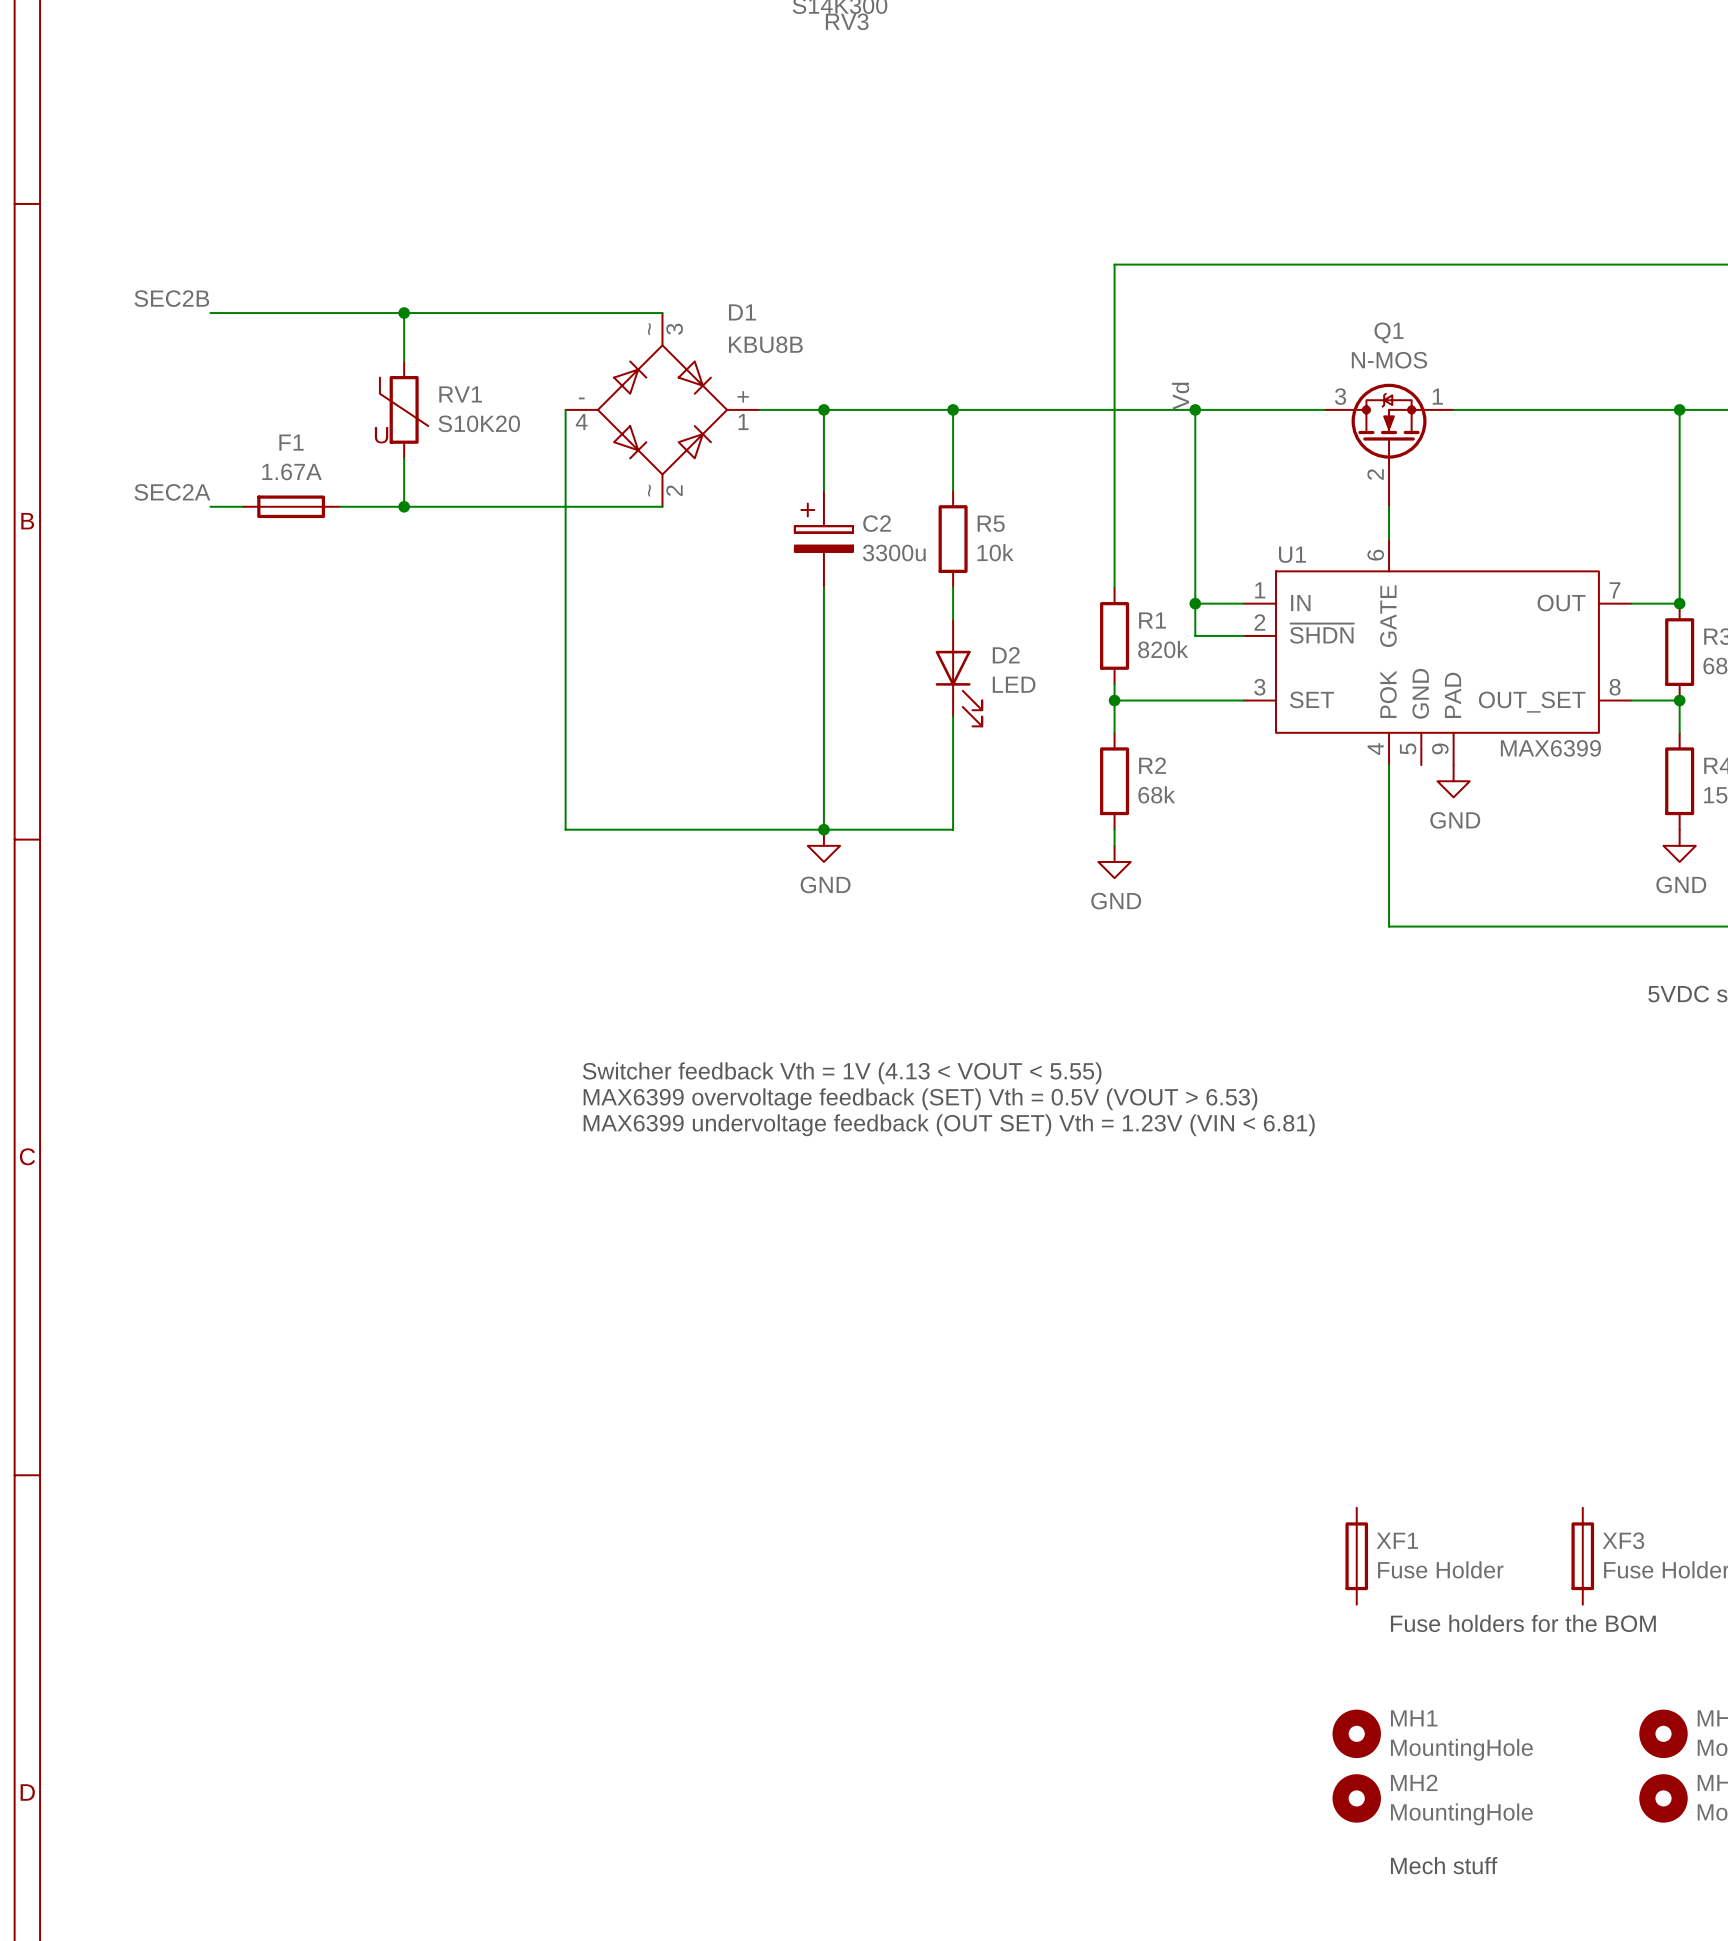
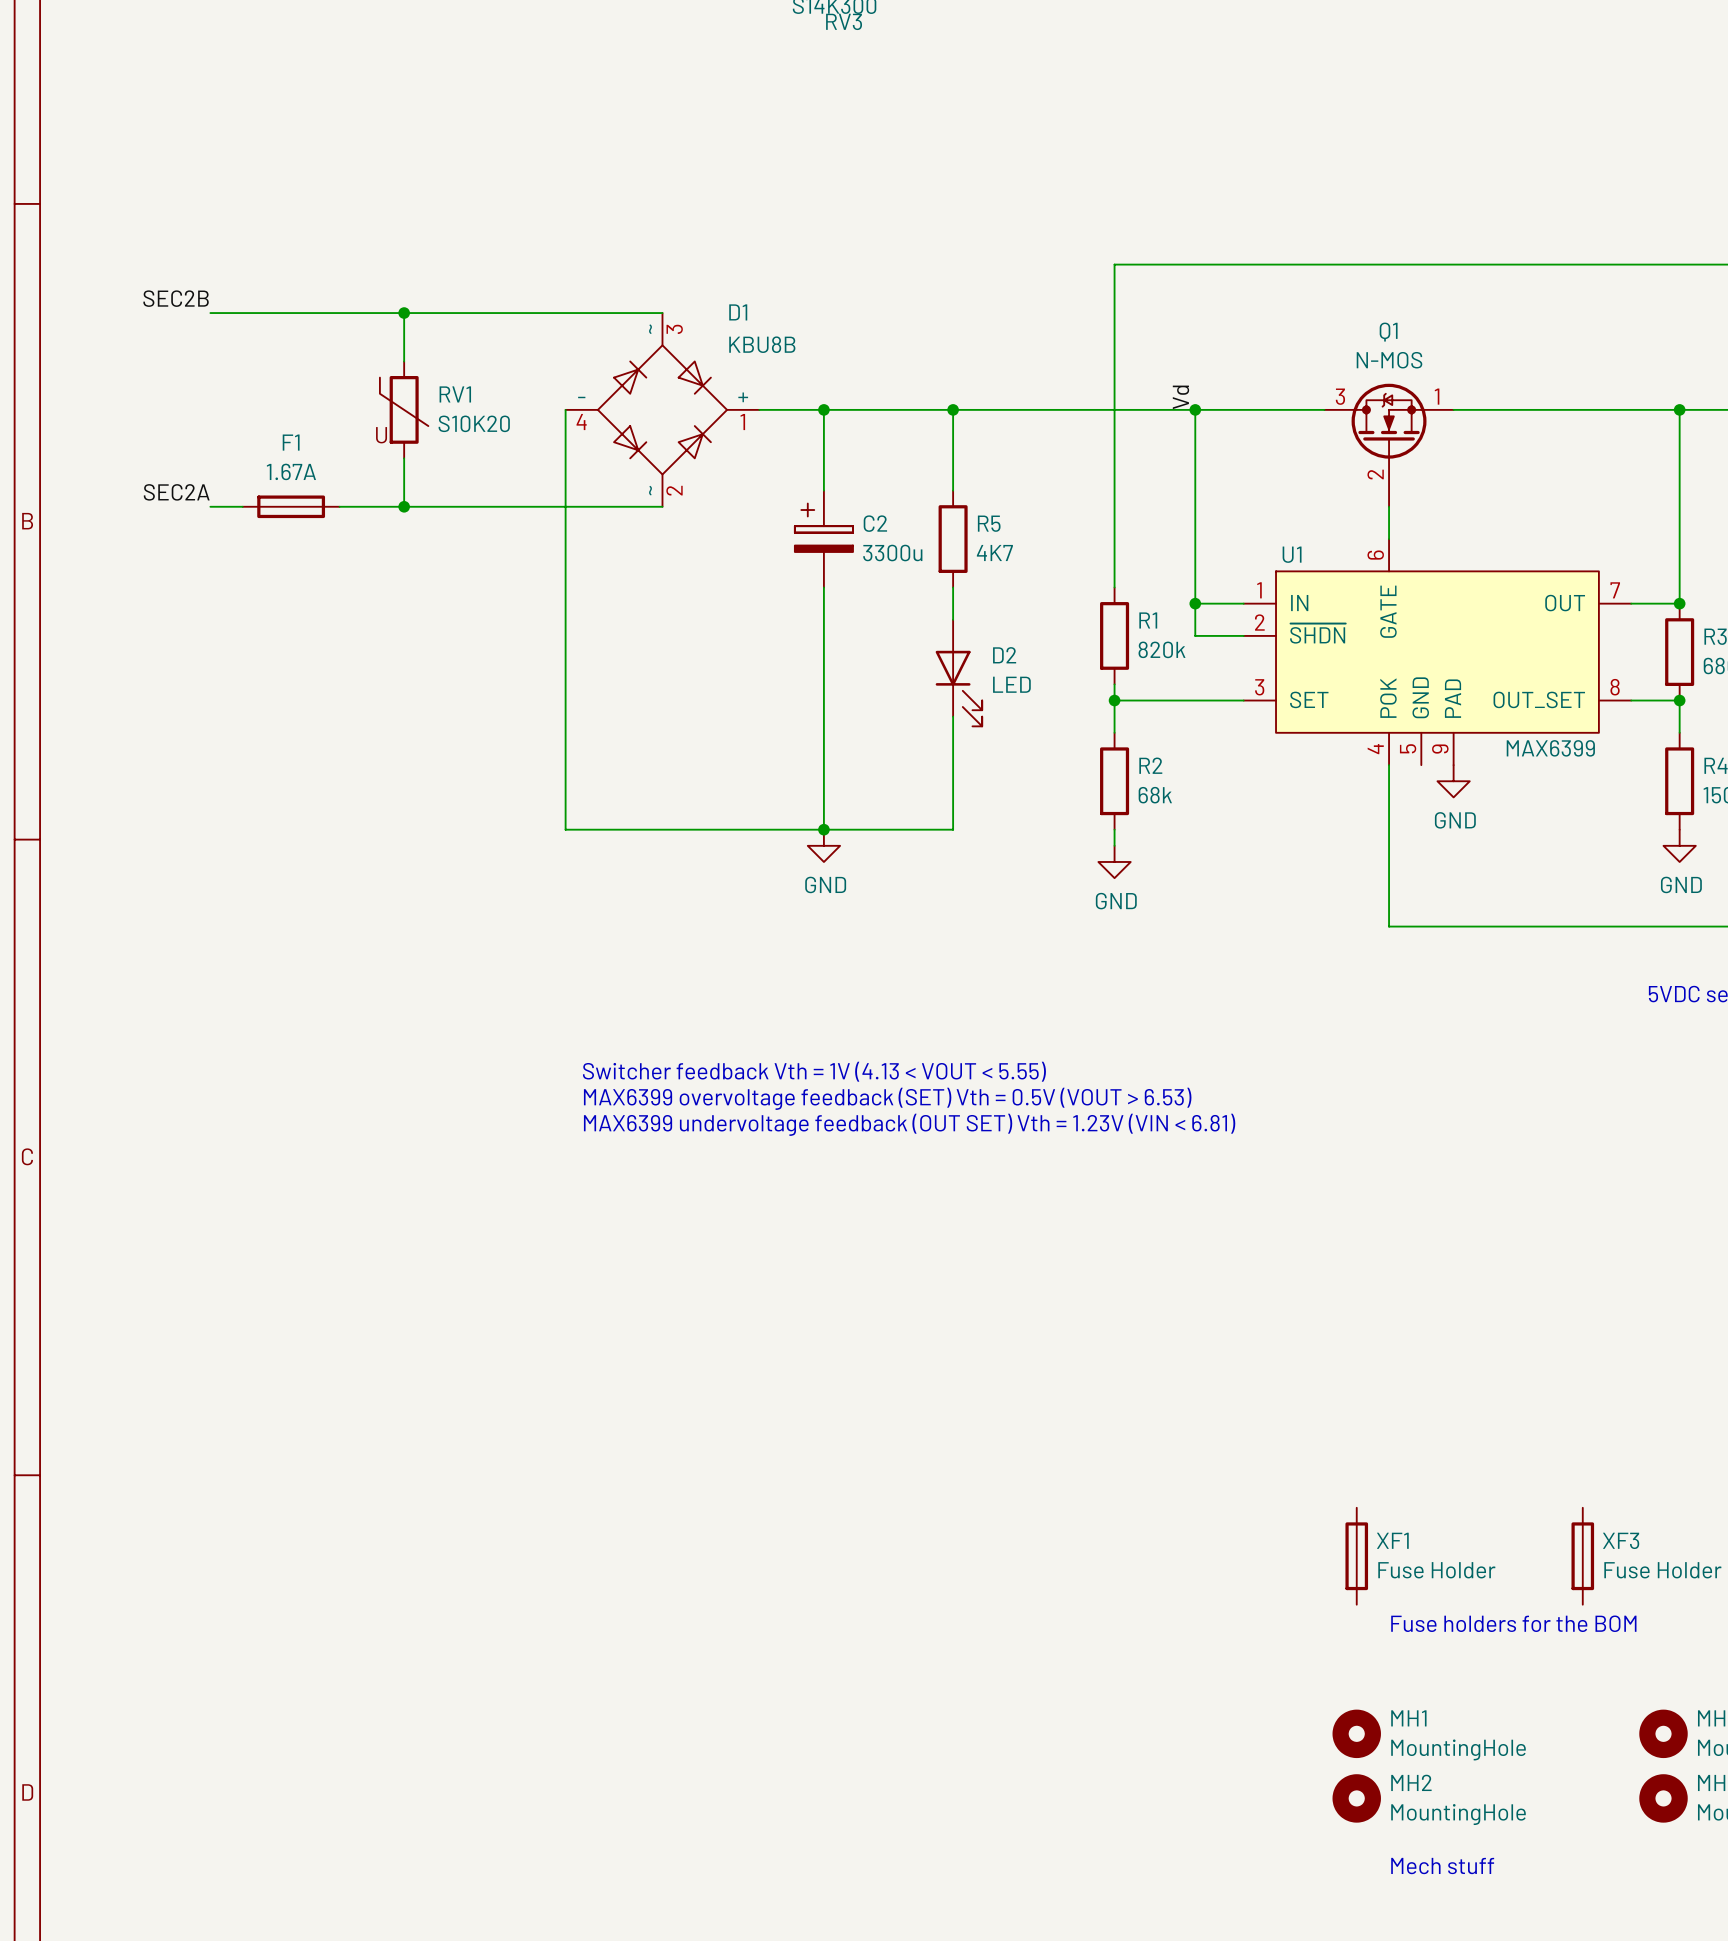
R5 value: 10k (995, 552) -> 4K7 (994, 553)

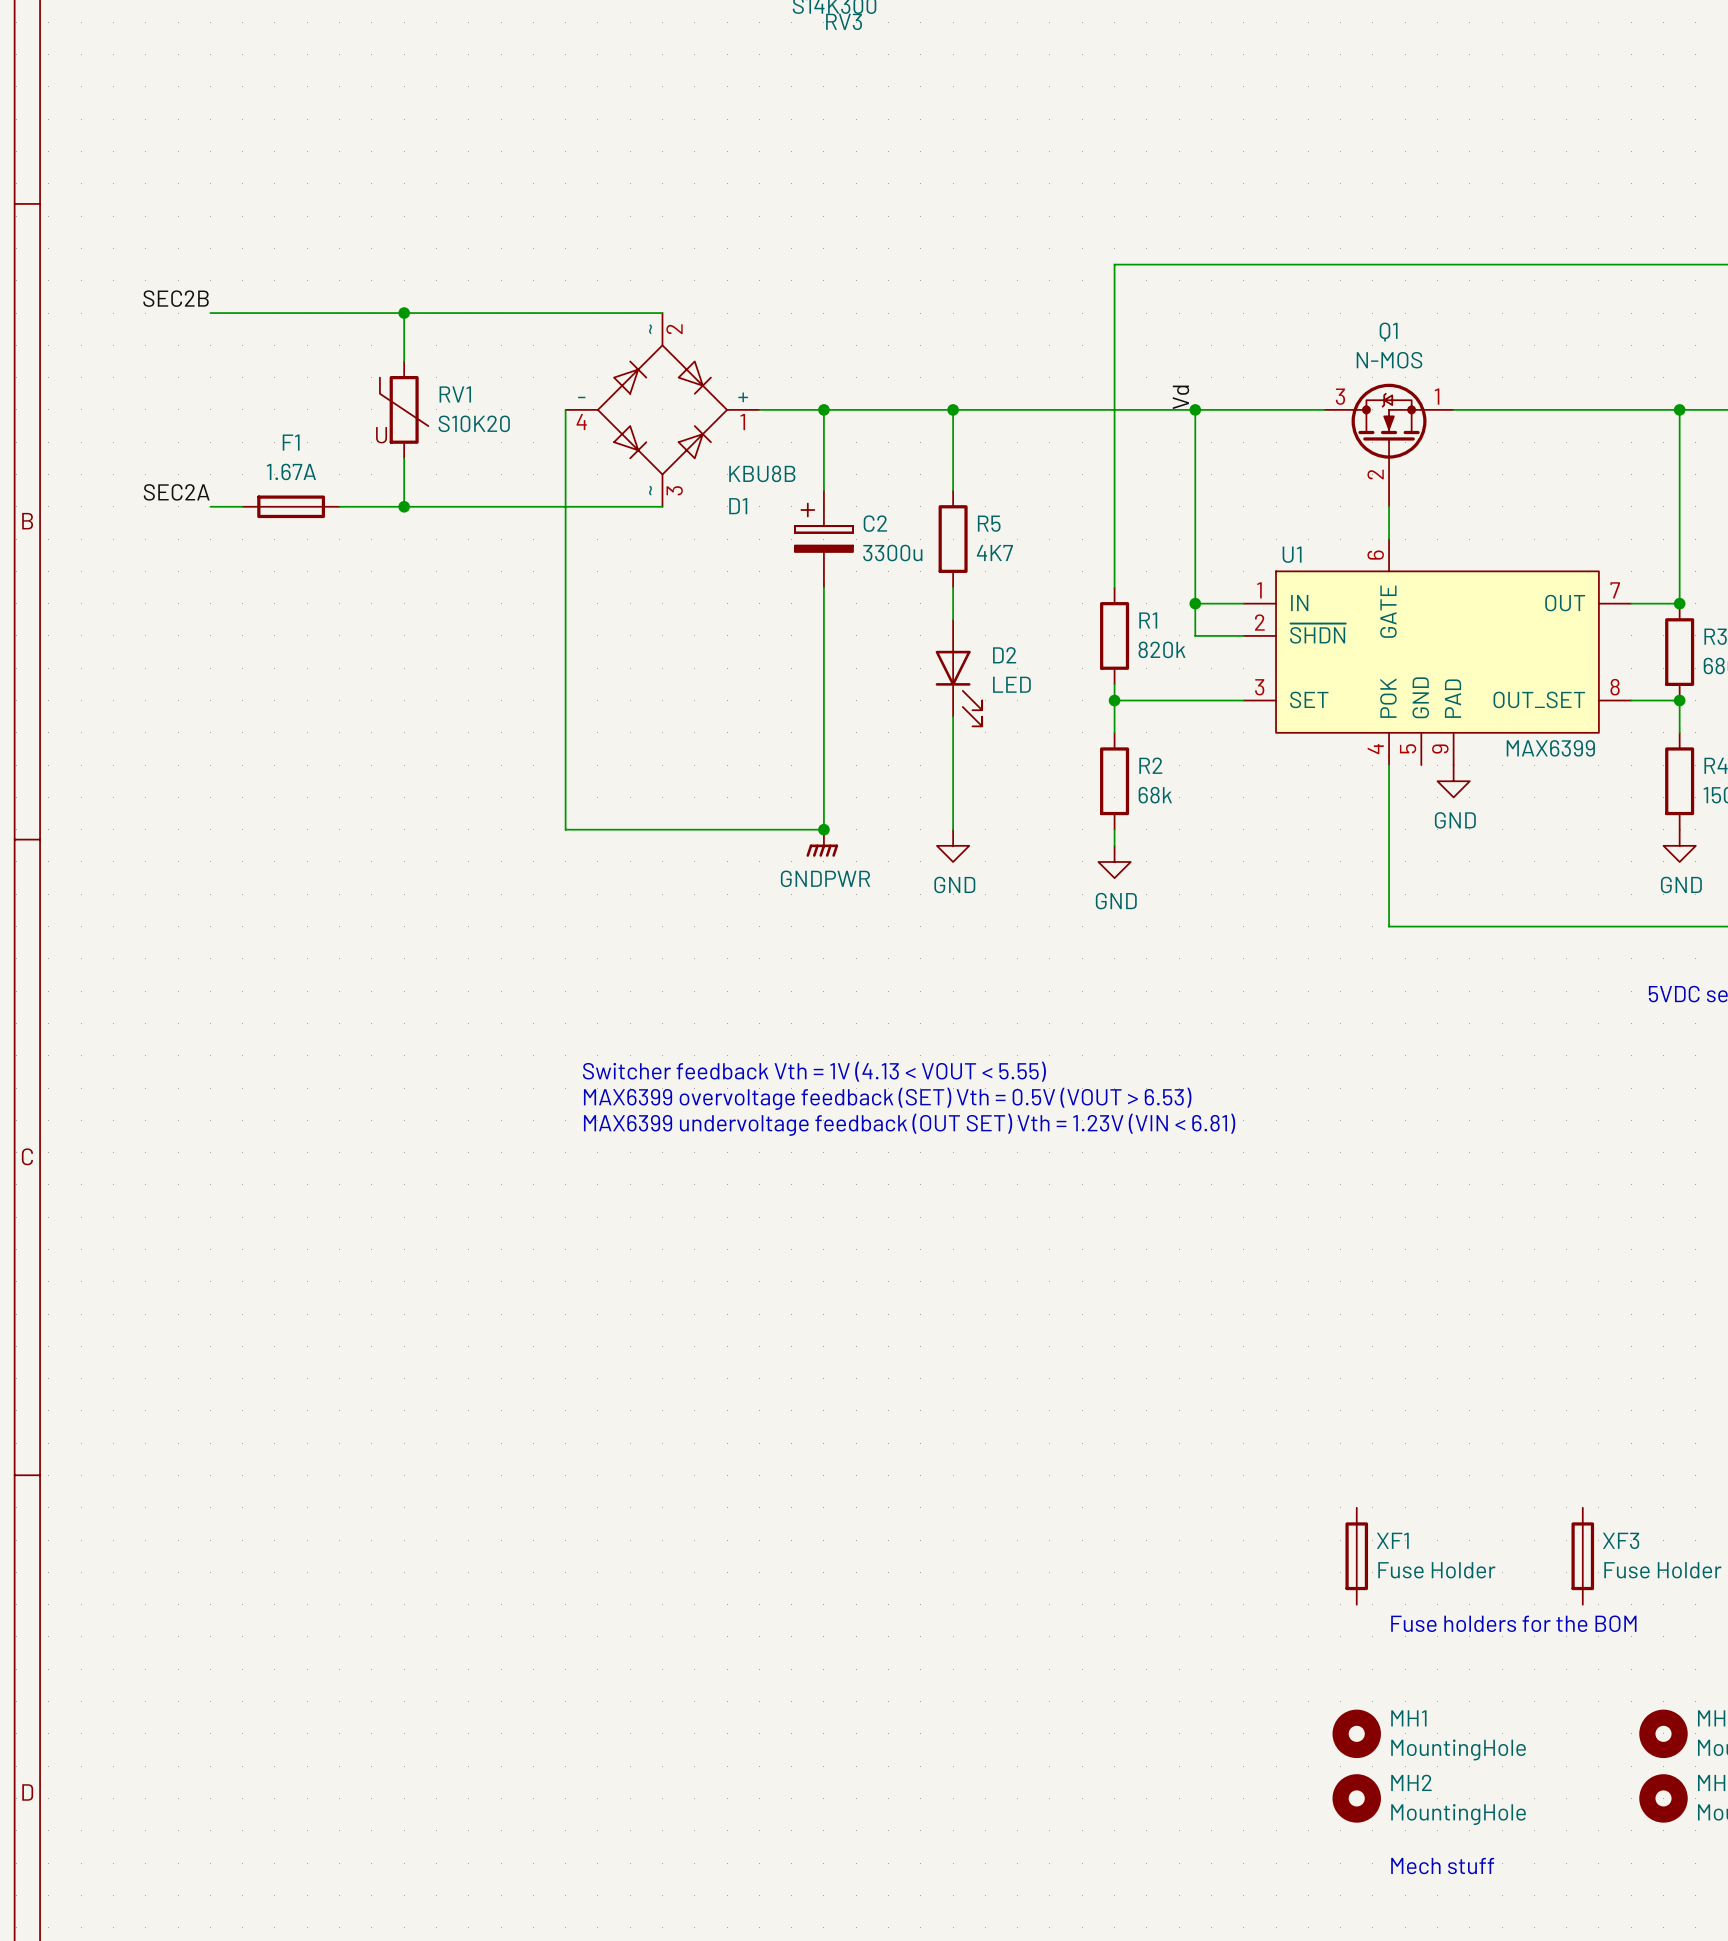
D1 flip: as is (662, 409) -> up-down (662, 409)
wire: (823, 829) (953, 829) -> none
power symbol: GND (823, 845) -> GNDPWR (822, 843)
power symbol: none -> GND (953, 845)

